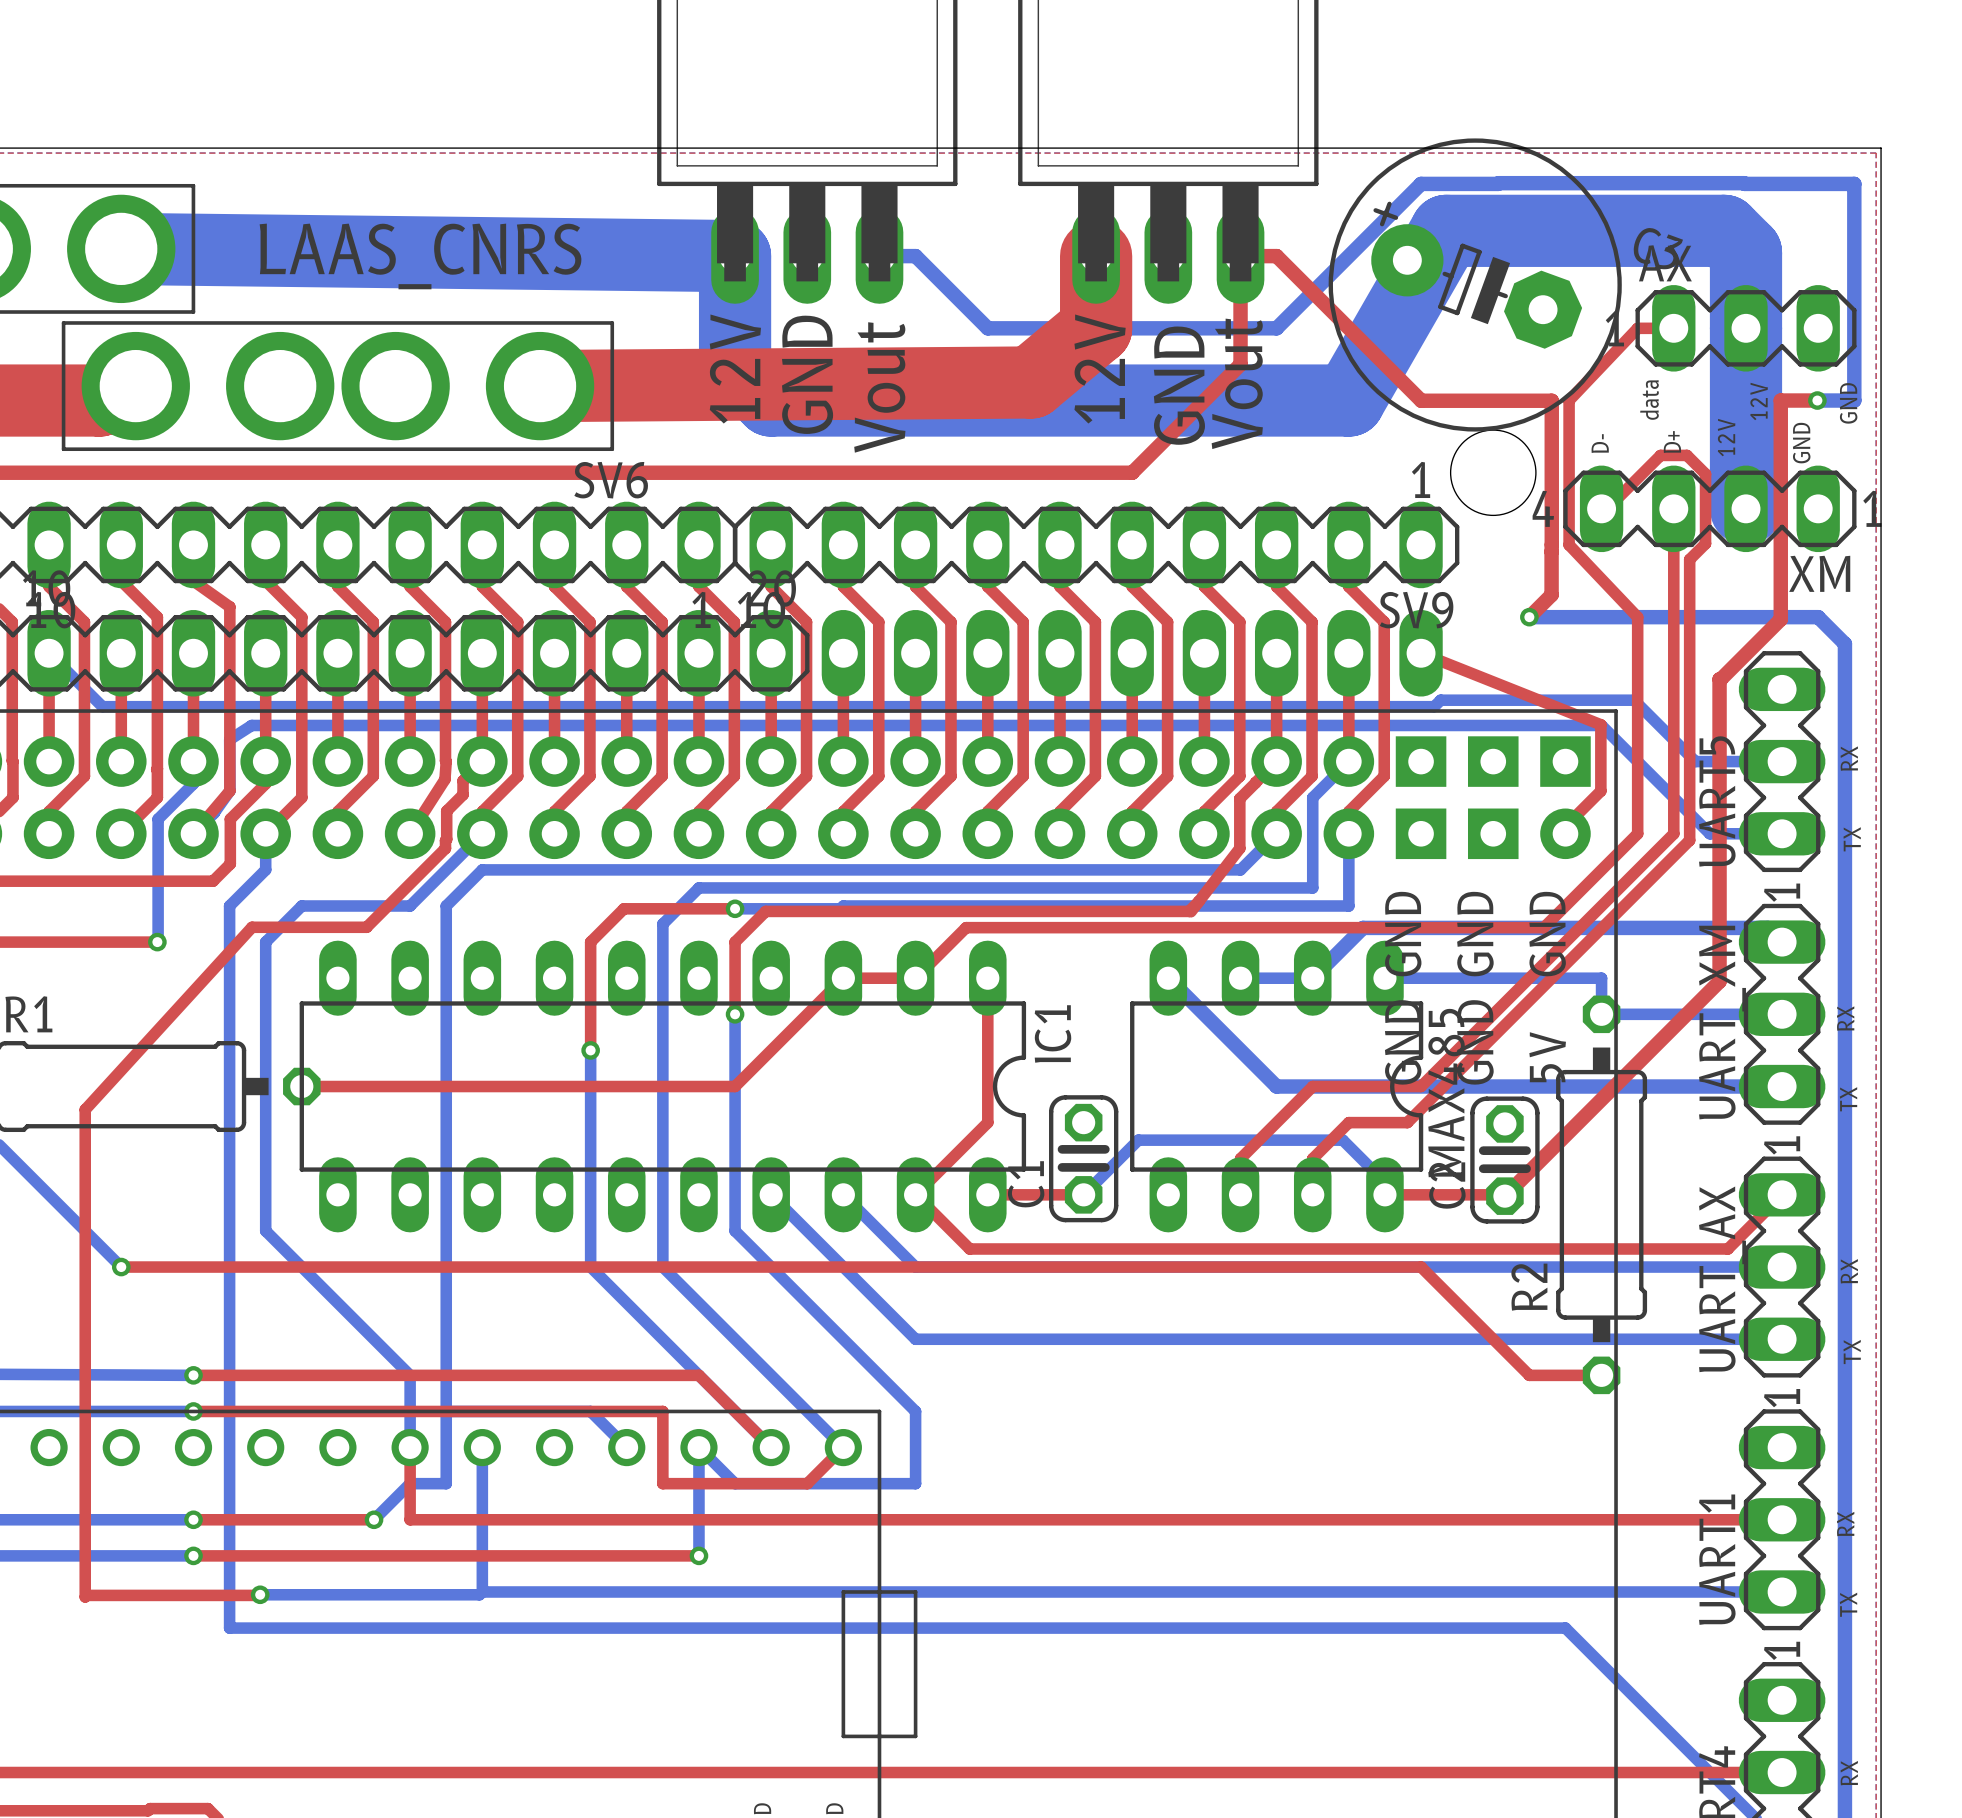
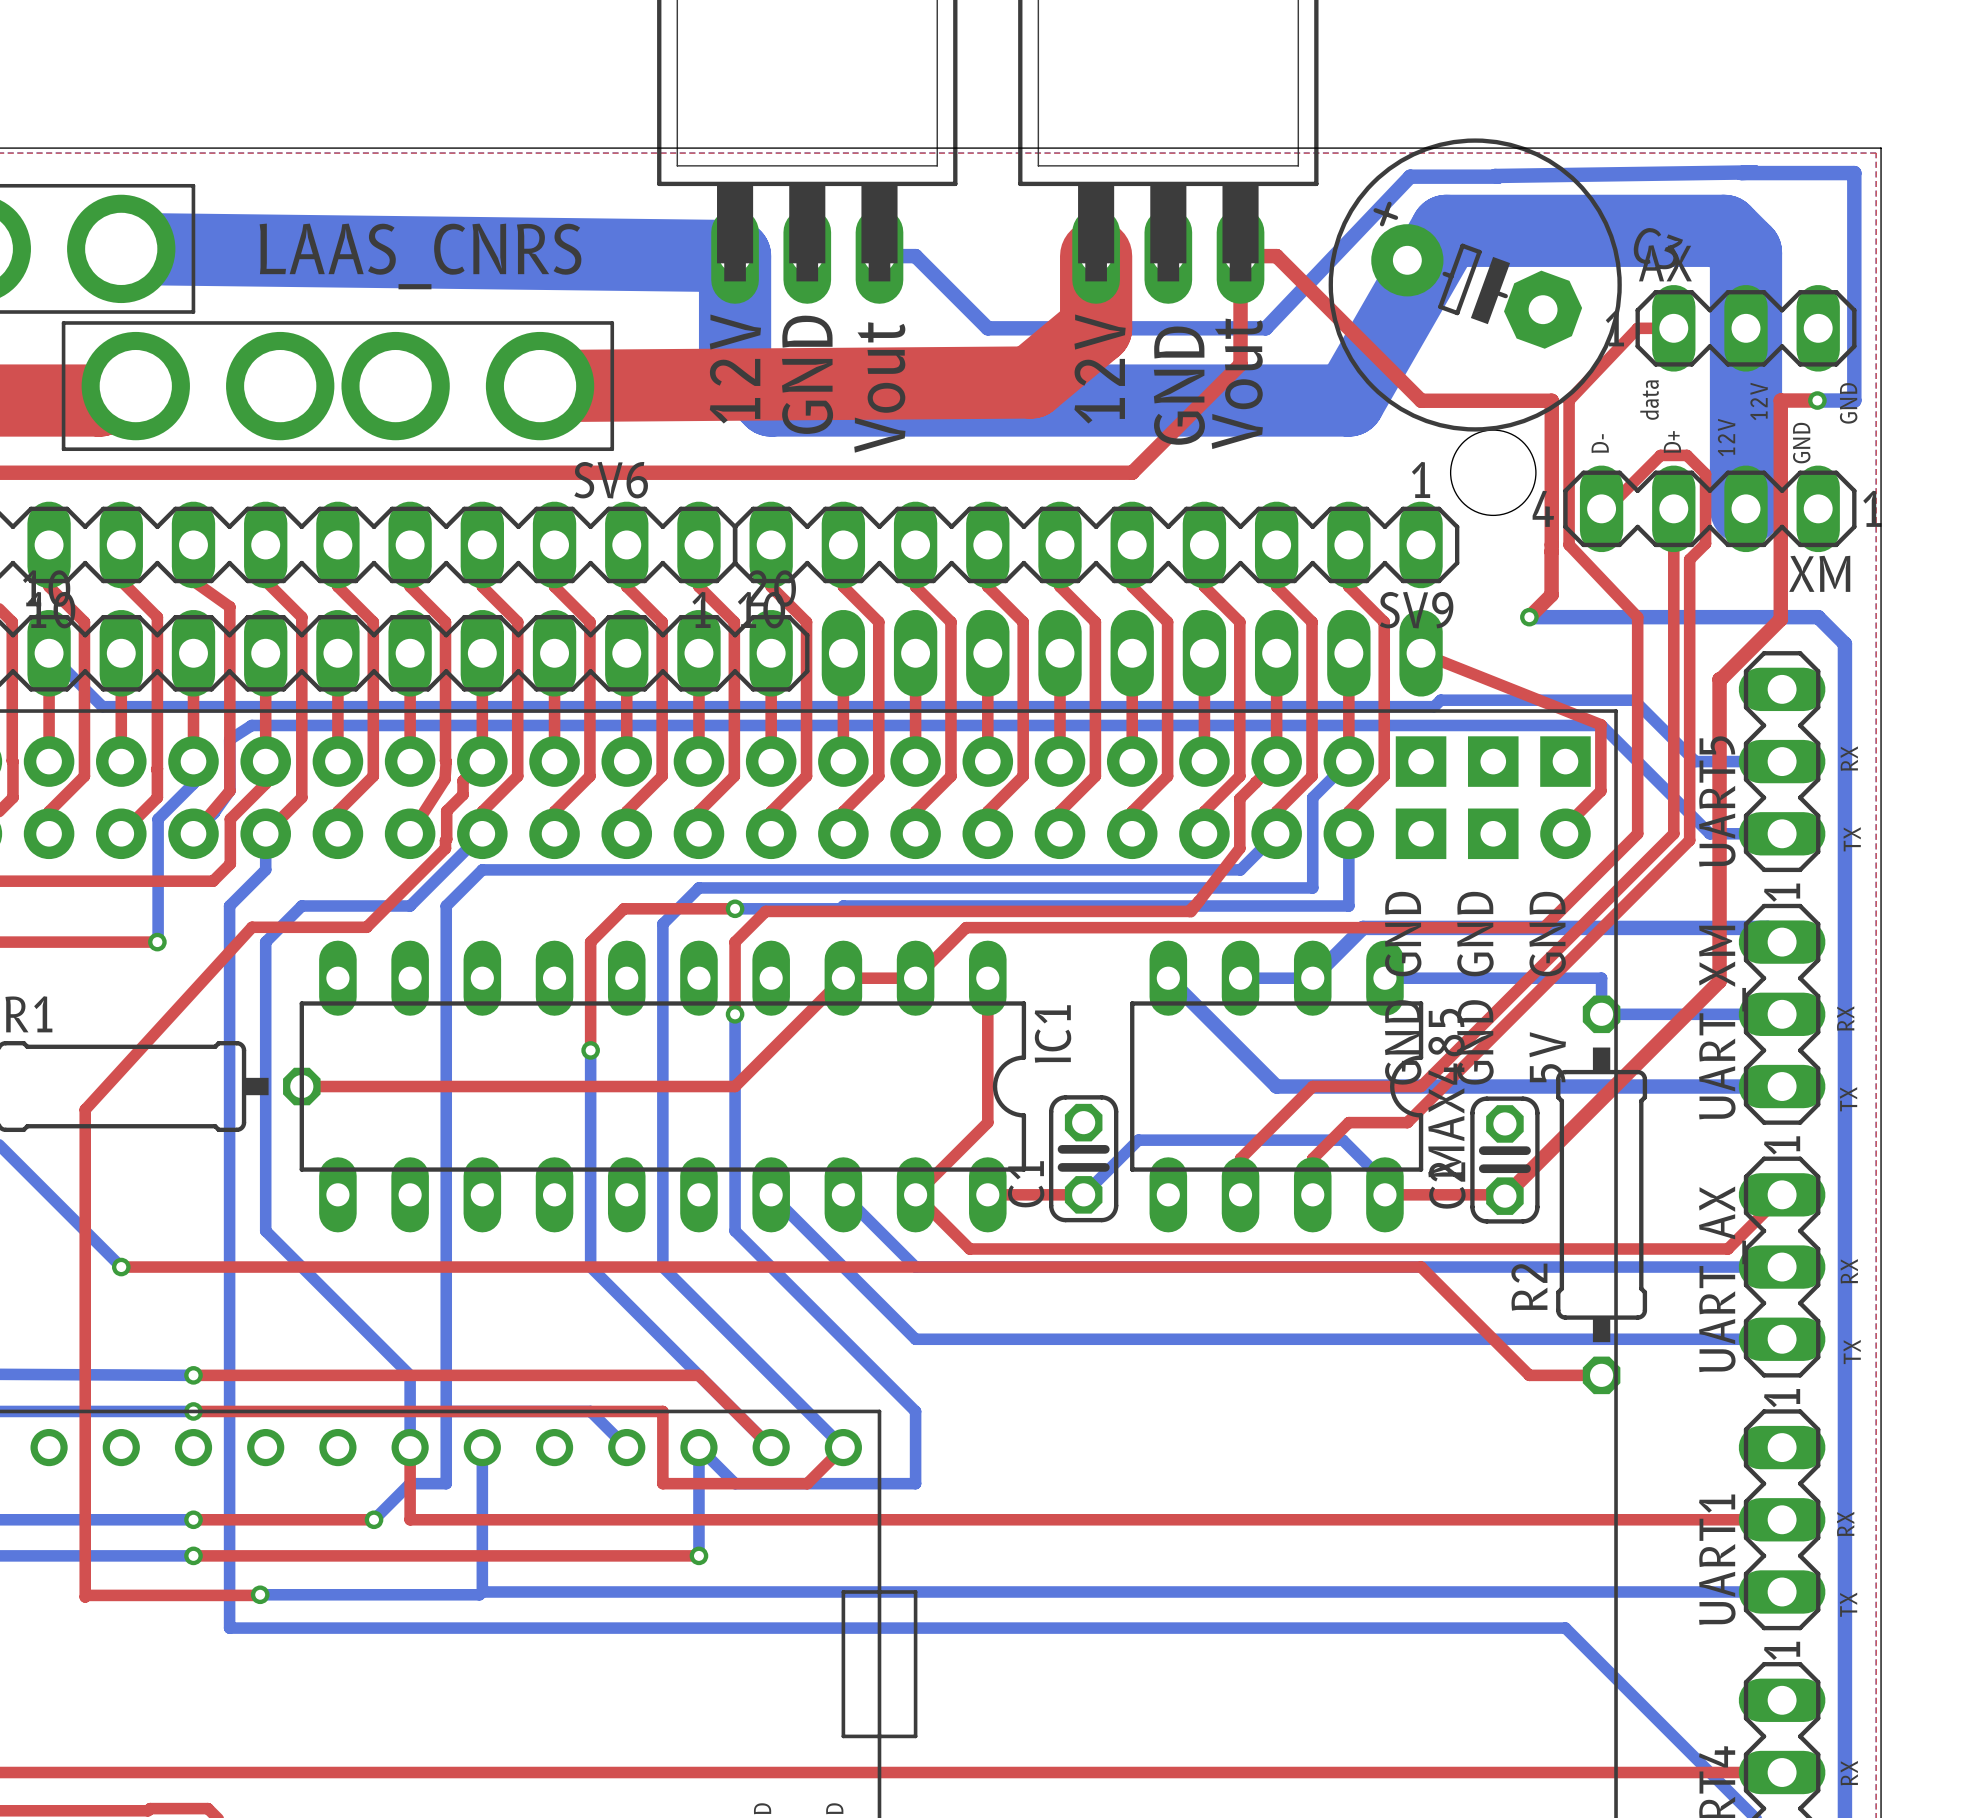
bottom track: (1854, 183) (1421, 183) (1276, 328) (1265, 328) -> (1854, 183) (1854, 173) (1741, 173) (1754, 172) (1410, 176) (1265, 328)

